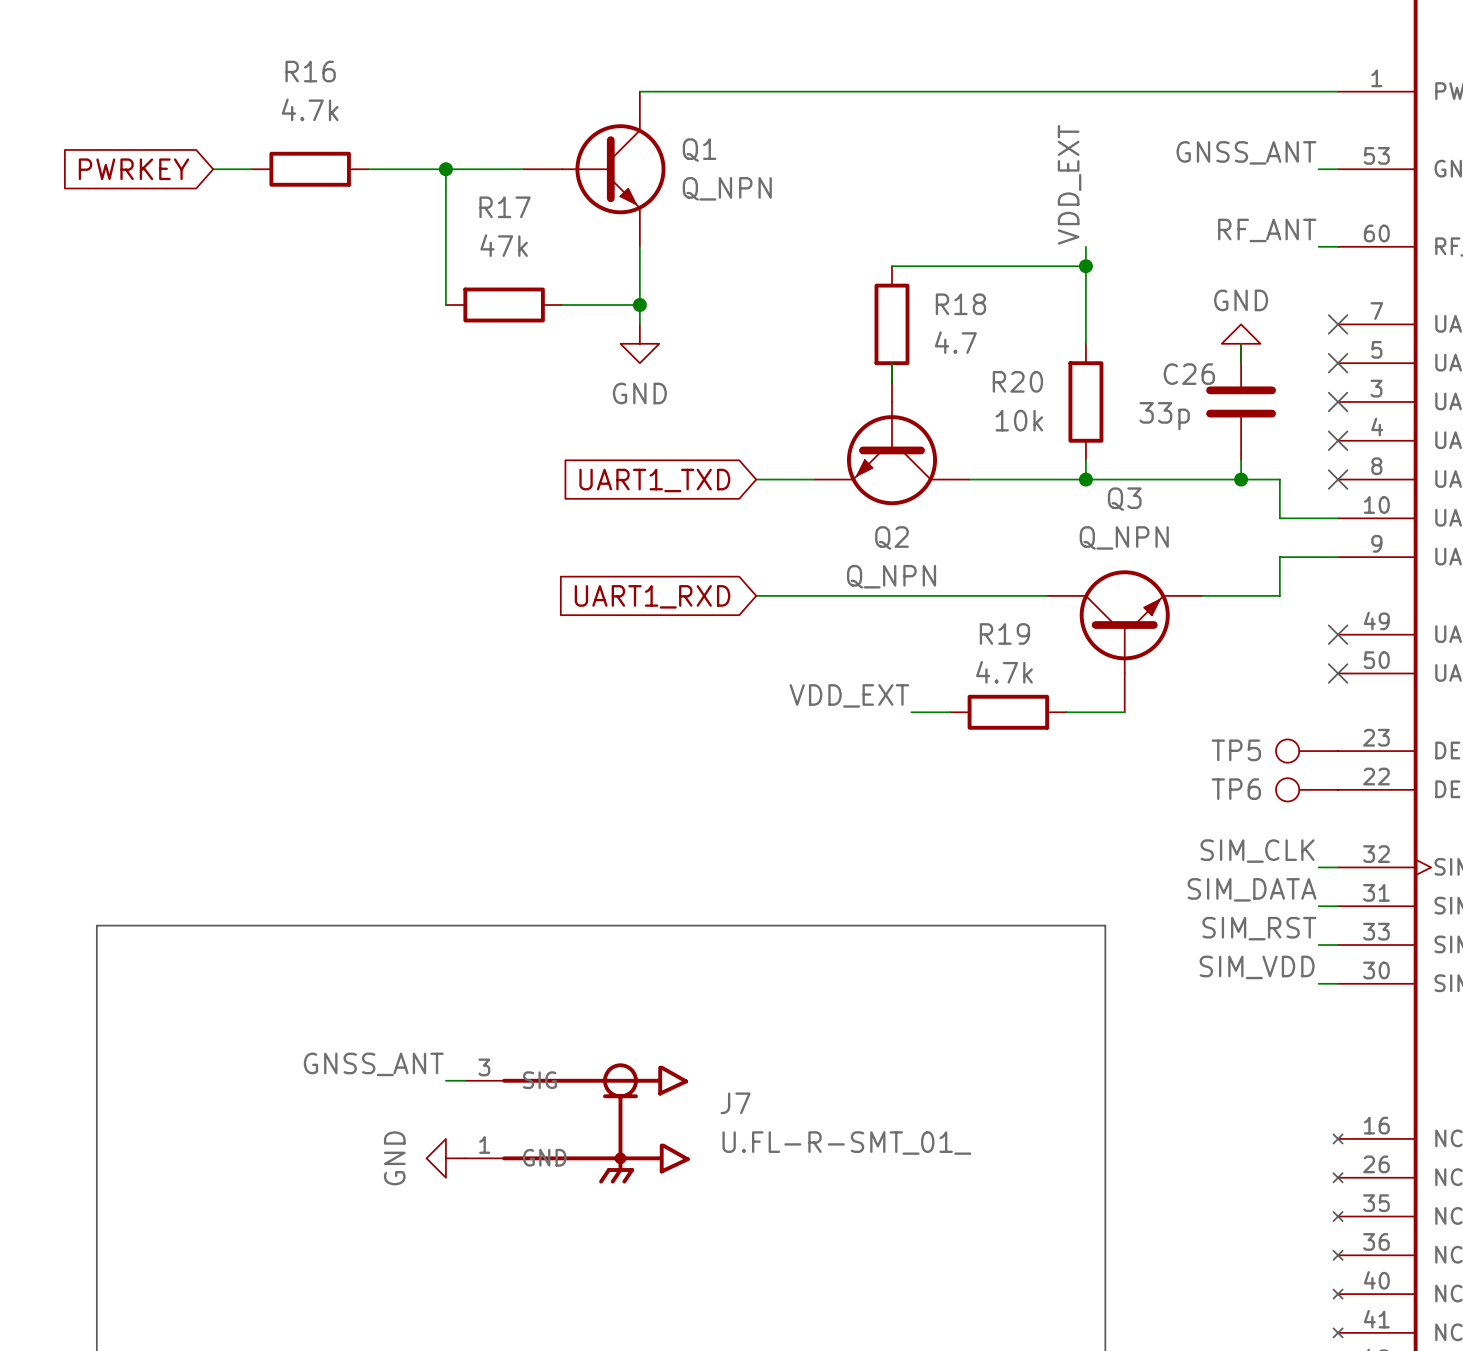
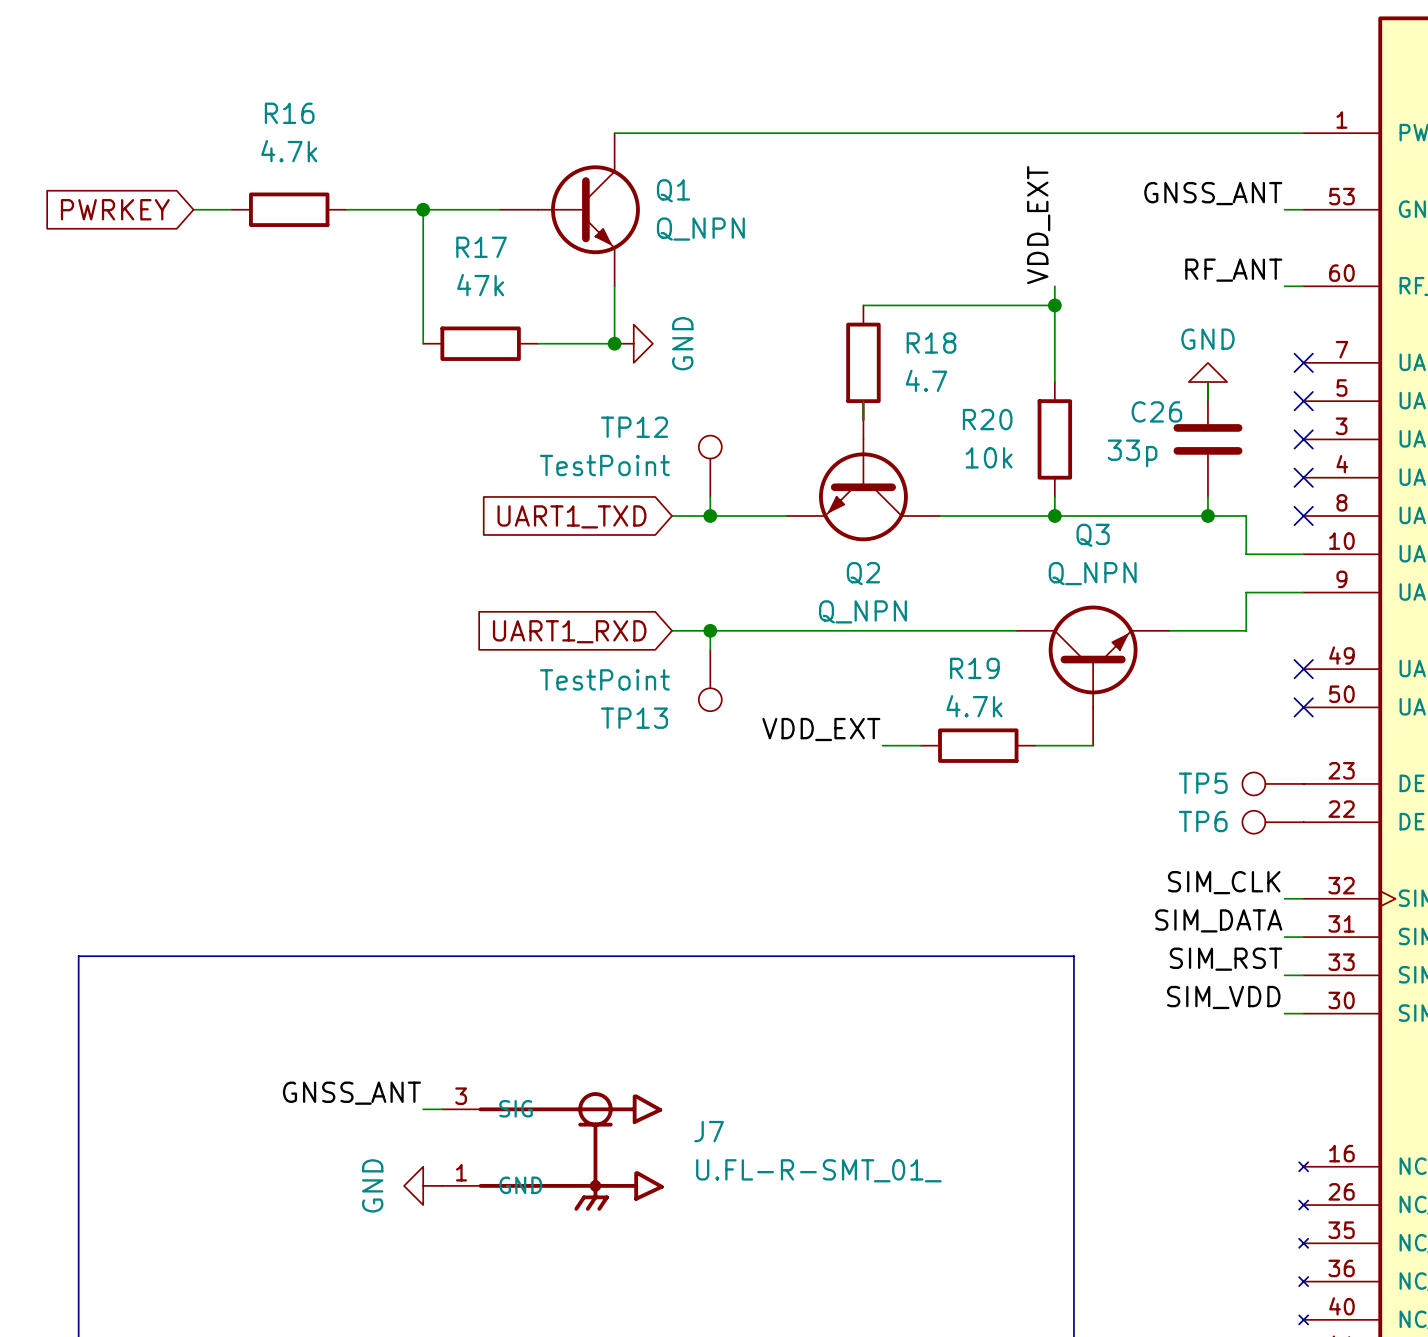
wire: (639, 305) (639, 324) -> (710, 496) (710, 515)
power symbol rotation: 0° (639, 343) -> 90° counterclockwise (633, 343)
power symbol position: GND (639, 343) -> GND (633, 343)
TP12: none -> TestPoint (710, 466)
wire: none -> (672, 515) (729, 515)
junction: none -> (710, 515)
global label position: UART1_TXD (654, 480) -> UART1_TXD (571, 516)
wire: none -> (672, 630) (729, 630)
wire: none -> (710, 630) (710, 649)
junction: none -> (710, 630)
global label position: UART1_RXD (652, 596) -> UART1_RXD (569, 631)
TP13: none -> TestPoint (710, 680)

